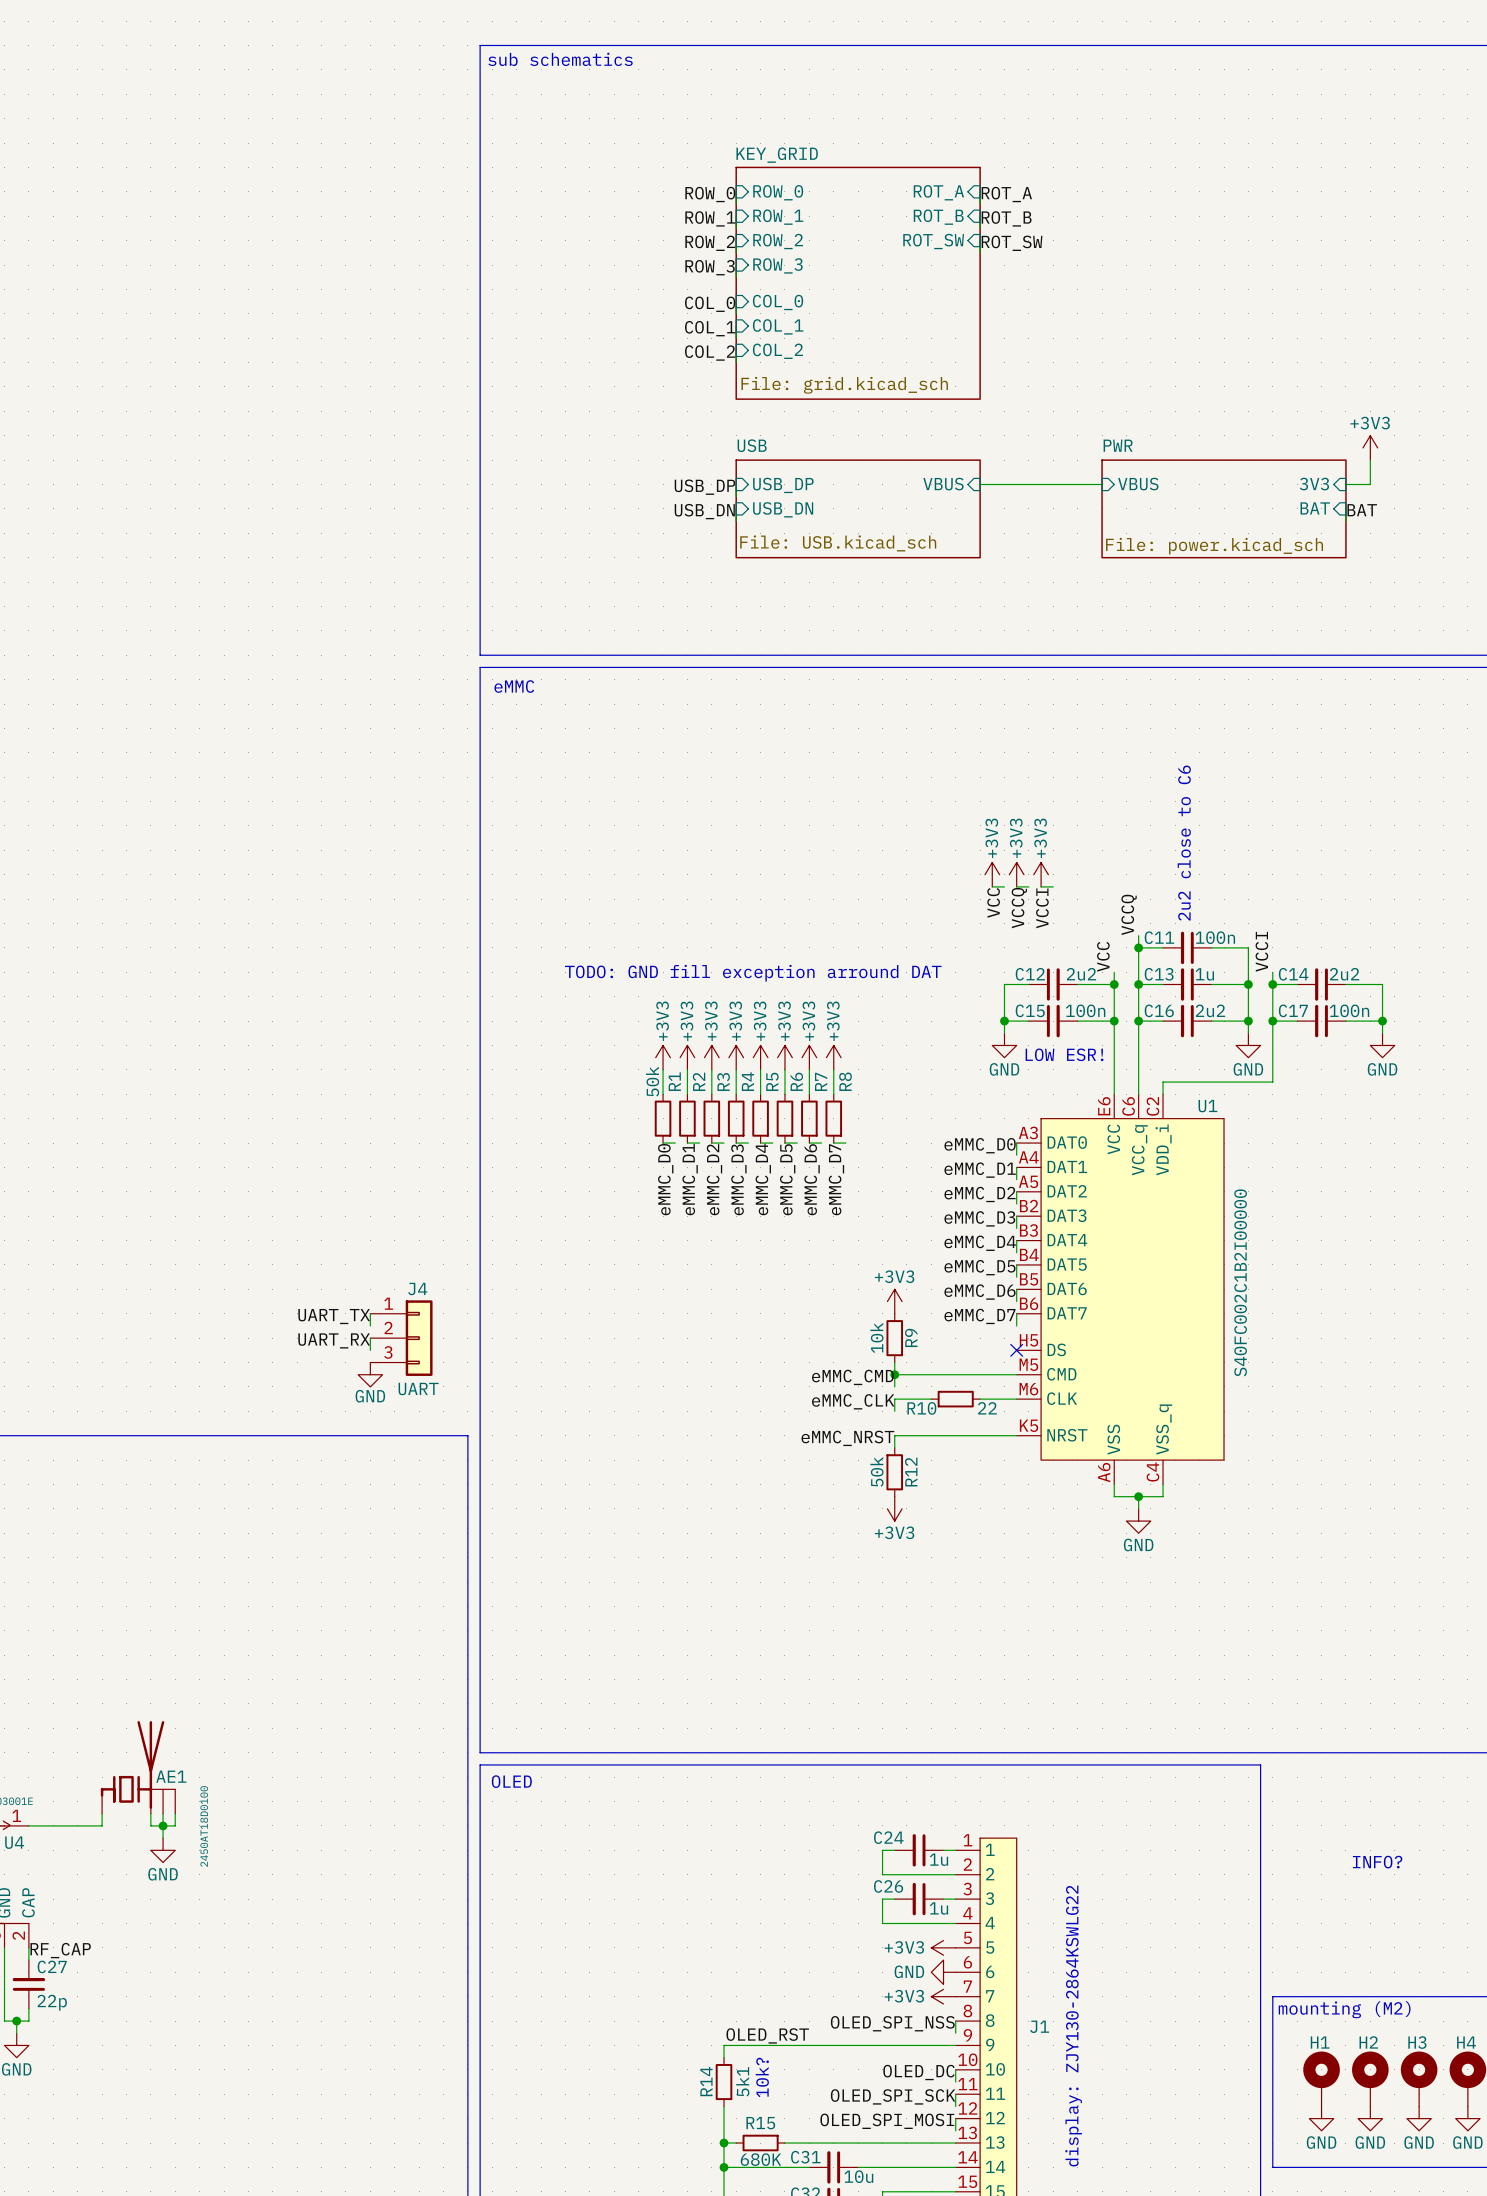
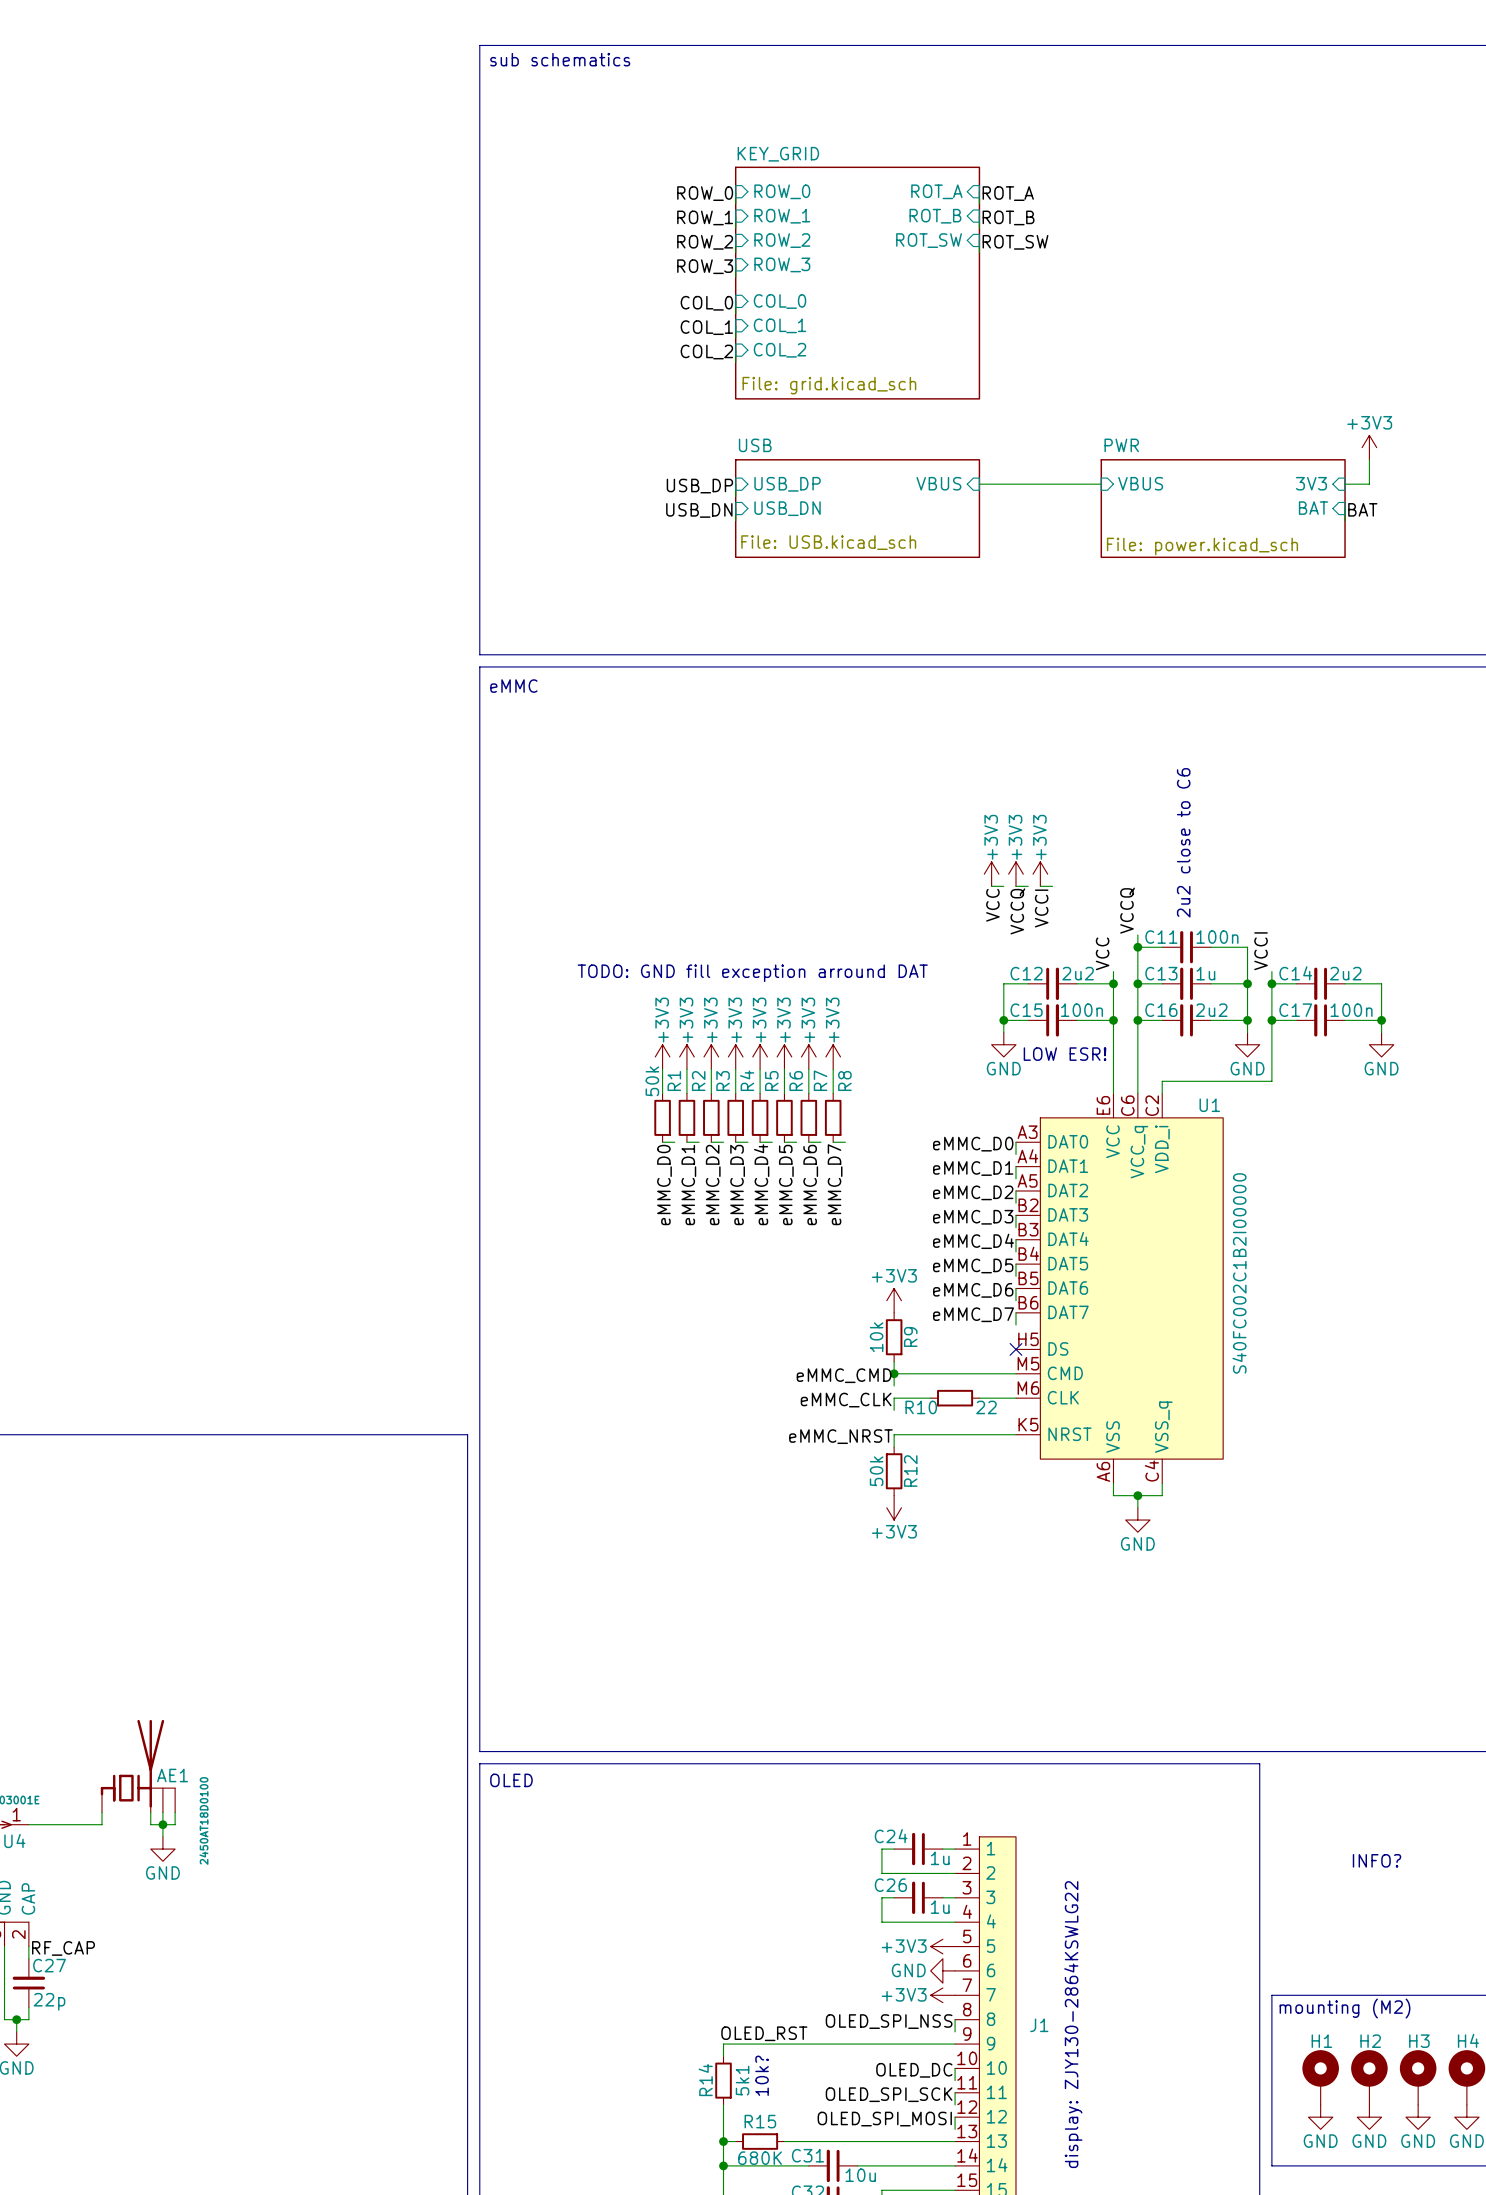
wire: (370, 1313) (370, 1325) -> none
label: UART_TX (334, 1316) -> none
wire: (370, 1338) (370, 1350) -> none
J4: UART (401, 1338) -> none
label: UART_RX (334, 1340) -> none
power symbol: GND (370, 1374) -> none

